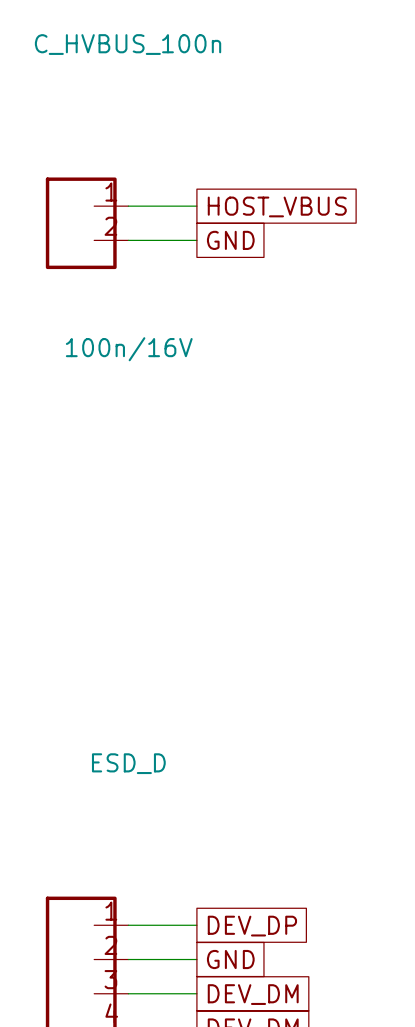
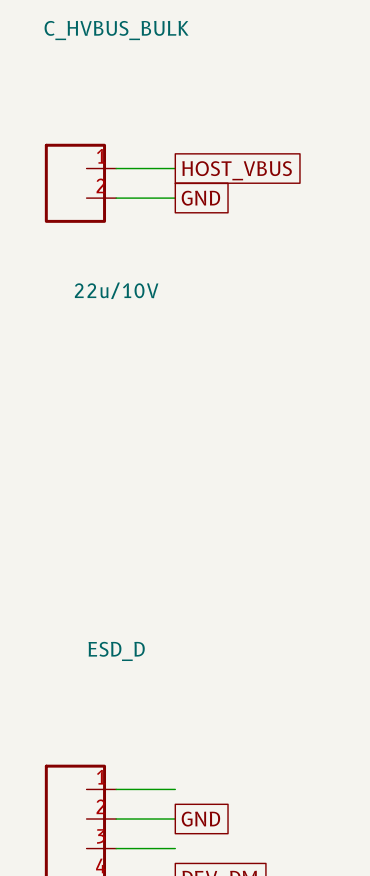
C_HVBUS_100n name: C_HVBUS_100n (128, 44) -> C_HVBUS_BULK (116, 30)
C_HVBUS_100n value: 100n/16V (129, 349) -> 22u/10V (116, 290)
global label: DEV_DP (252, 926) -> none
global label: DEV_DM (253, 994) -> none

